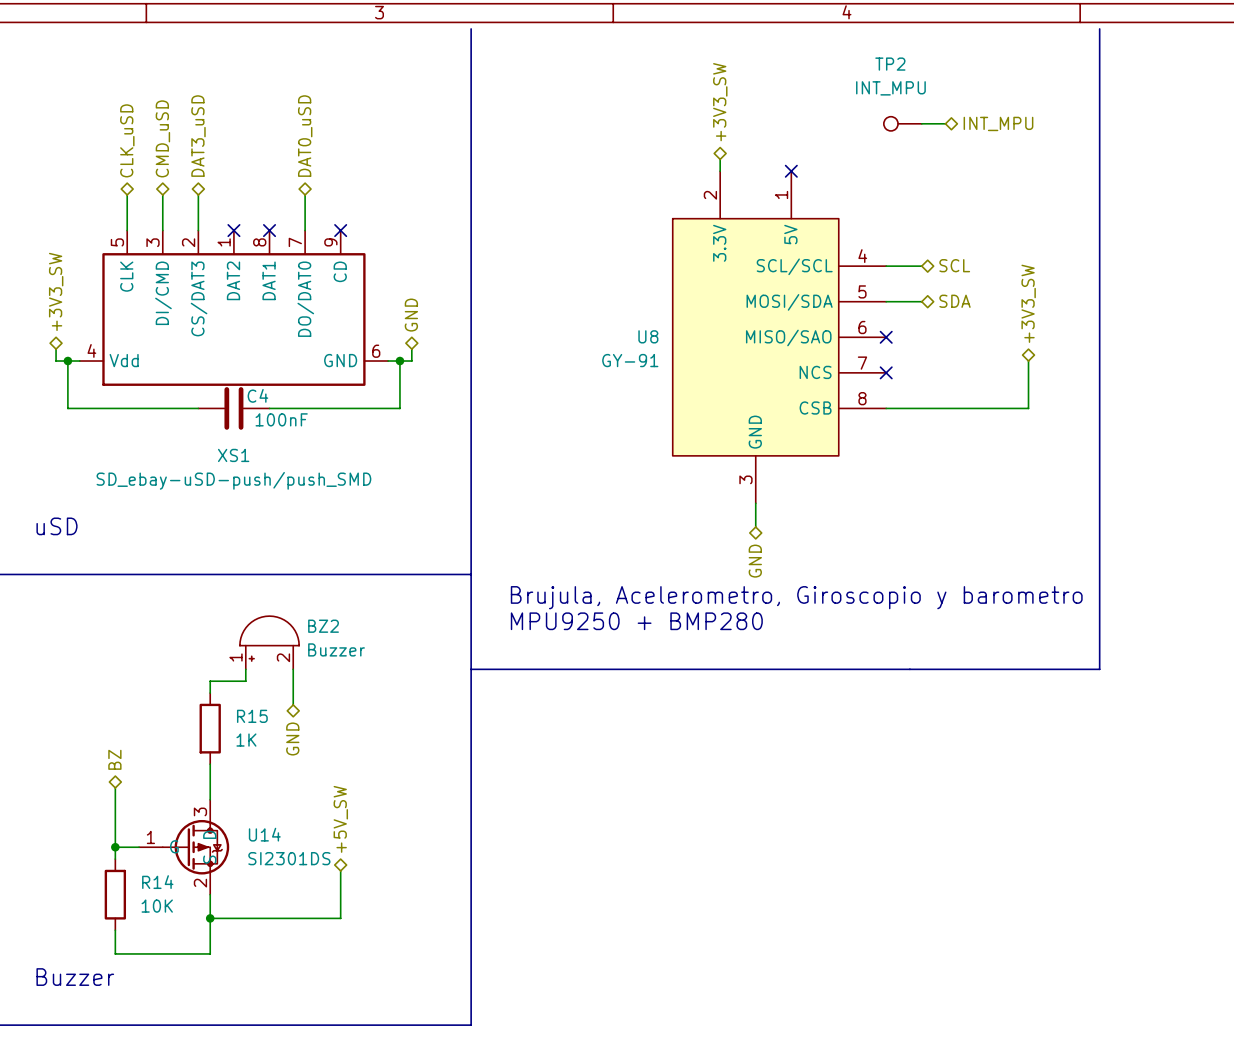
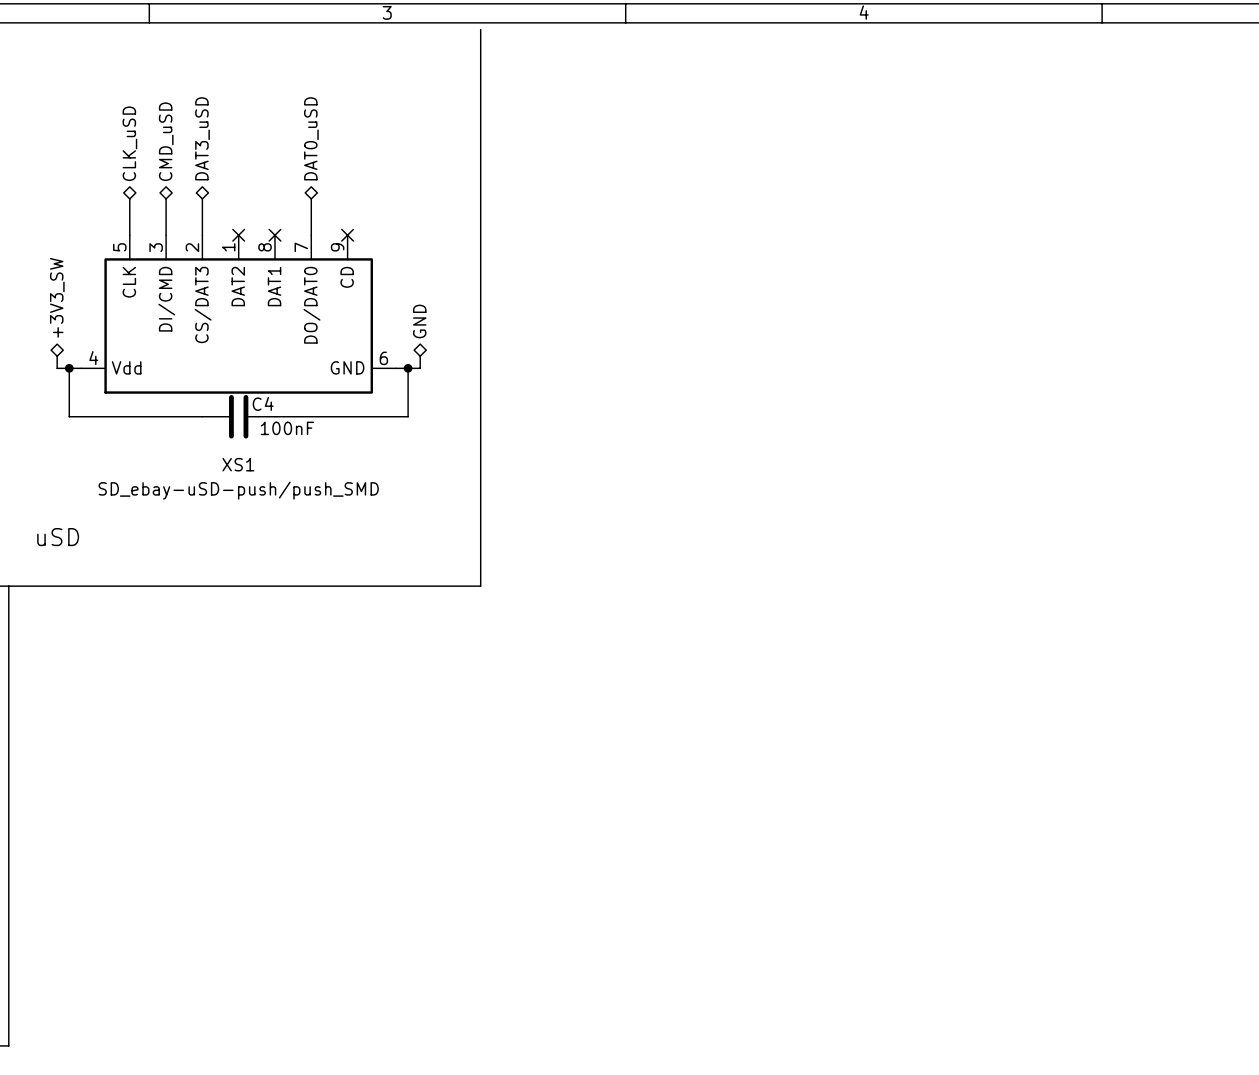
line: (1099, 28) (1099, 669) (471, 669) -> none
hierarchical label: +3V3_SW (720, 102) -> none
TP2: INT_MPU (902, 123) -> none
wire: (921, 123) (945, 123) -> none
hierarchical label: INT_MPU (998, 123) -> none
wire: (720, 159) (720, 171) -> none
no-connect mark: (791, 171) -> none
hierarchical label: SCL (954, 265) -> none
wire: (886, 266) (921, 266) -> none
wire: (886, 301) (921, 301) -> none
hierarchical label: SDA (955, 301) -> none
hierarchical label: +3V3_SW (1028, 303) -> none
U8: GY-91 (779, 337) -> none
no-connect mark: (886, 337) -> none
wire: (1028, 361) (1028, 408) (886, 408) -> none
no-connect mark: (886, 372) -> none
wire: (755, 503) (755, 527) -> none
hierarchical label: GND (755, 561) -> none
line: (471, 574) (471, 1025) (8, 1025) -> (8, 586) (8, 1045)
text: Brujula, Acelerometro, Giroscopio y barometro (796, 597) -> none
text: MPU9250 + BMP280 (636, 621) -> none
BZ2: Buzzer (269, 642) -> none
wire: (245, 669) (245, 681) (210, 681) (210, 693) -> none
wire: (293, 669) (293, 704) -> none
R15: 1K (210, 728) -> none
hierarchical label: GND (292, 738) -> none
hierarchical label: BZ (114, 759) -> none
wire: (210, 764) (210, 799) -> none
wire: (115, 787) (115, 859) -> none
hierarchical label: +5V_SW (340, 819) -> none
wire: (115, 847) (139, 847) -> none
junction: (115, 847) -> none
U14: SI2301DS (184, 847) -> none
wire: (340, 870) (340, 918) (210, 918) -> none
R14: 10K (115, 894) -> none
wire: (210, 894) (210, 953) (115, 953) (115, 930) -> none
junction: (210, 918) -> none
text: Buzzer (75, 977) -> none

